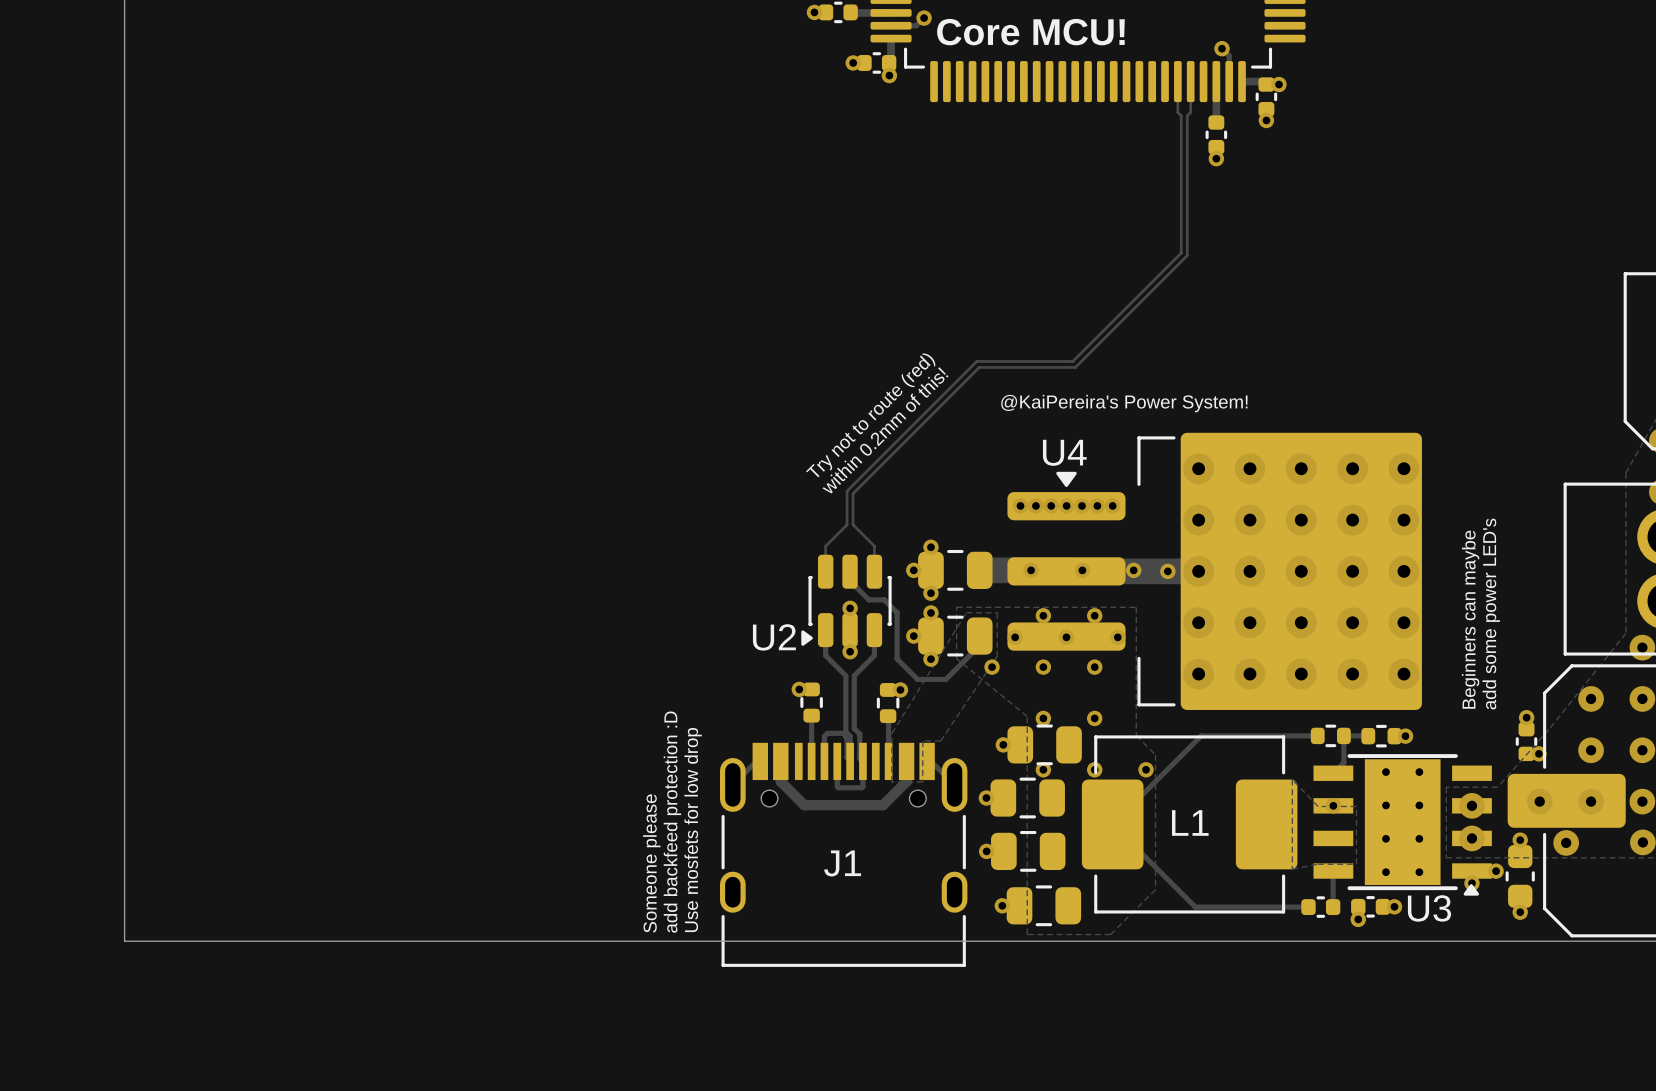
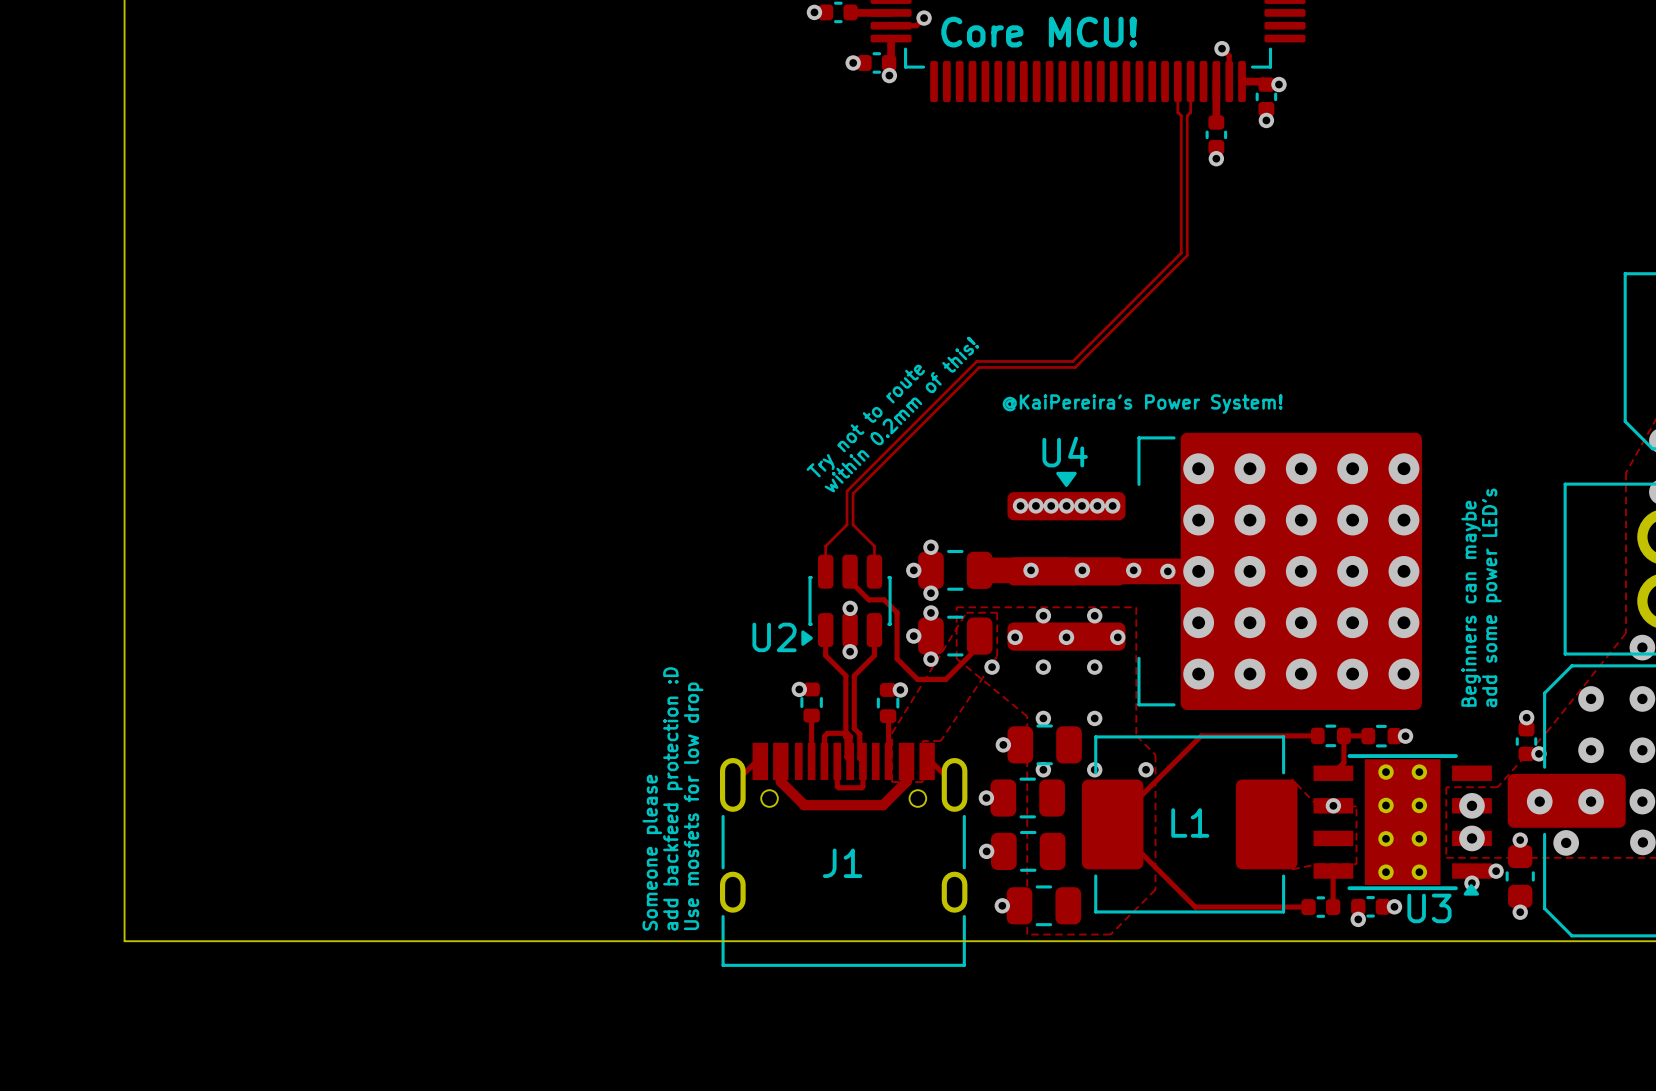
text: Try not to route (red) (870, 415) -> Try not to route (865, 420)

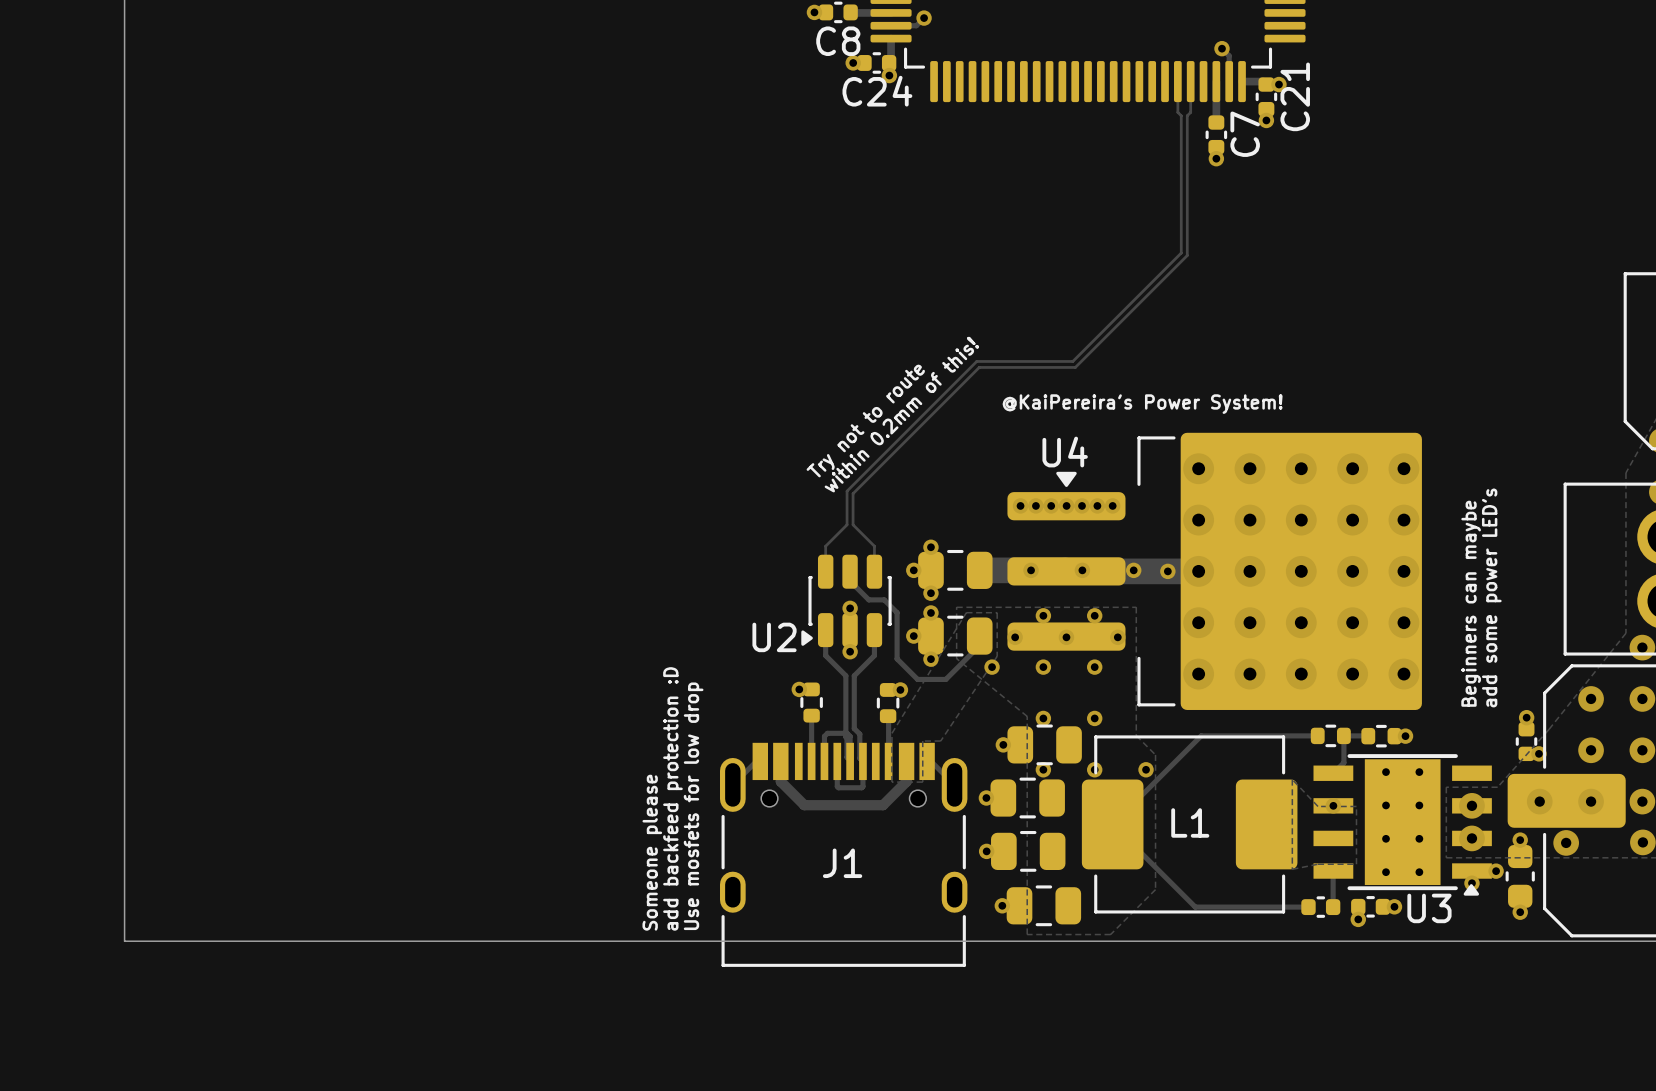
text: Core MCU! (1039, 32) -> none
C8 name: none -> C8 (838, 41)
C24 name: none -> C24 (877, 91)
C21 name: none -> C21 (1295, 96)
C7 name: none -> C7 (1245, 134)

